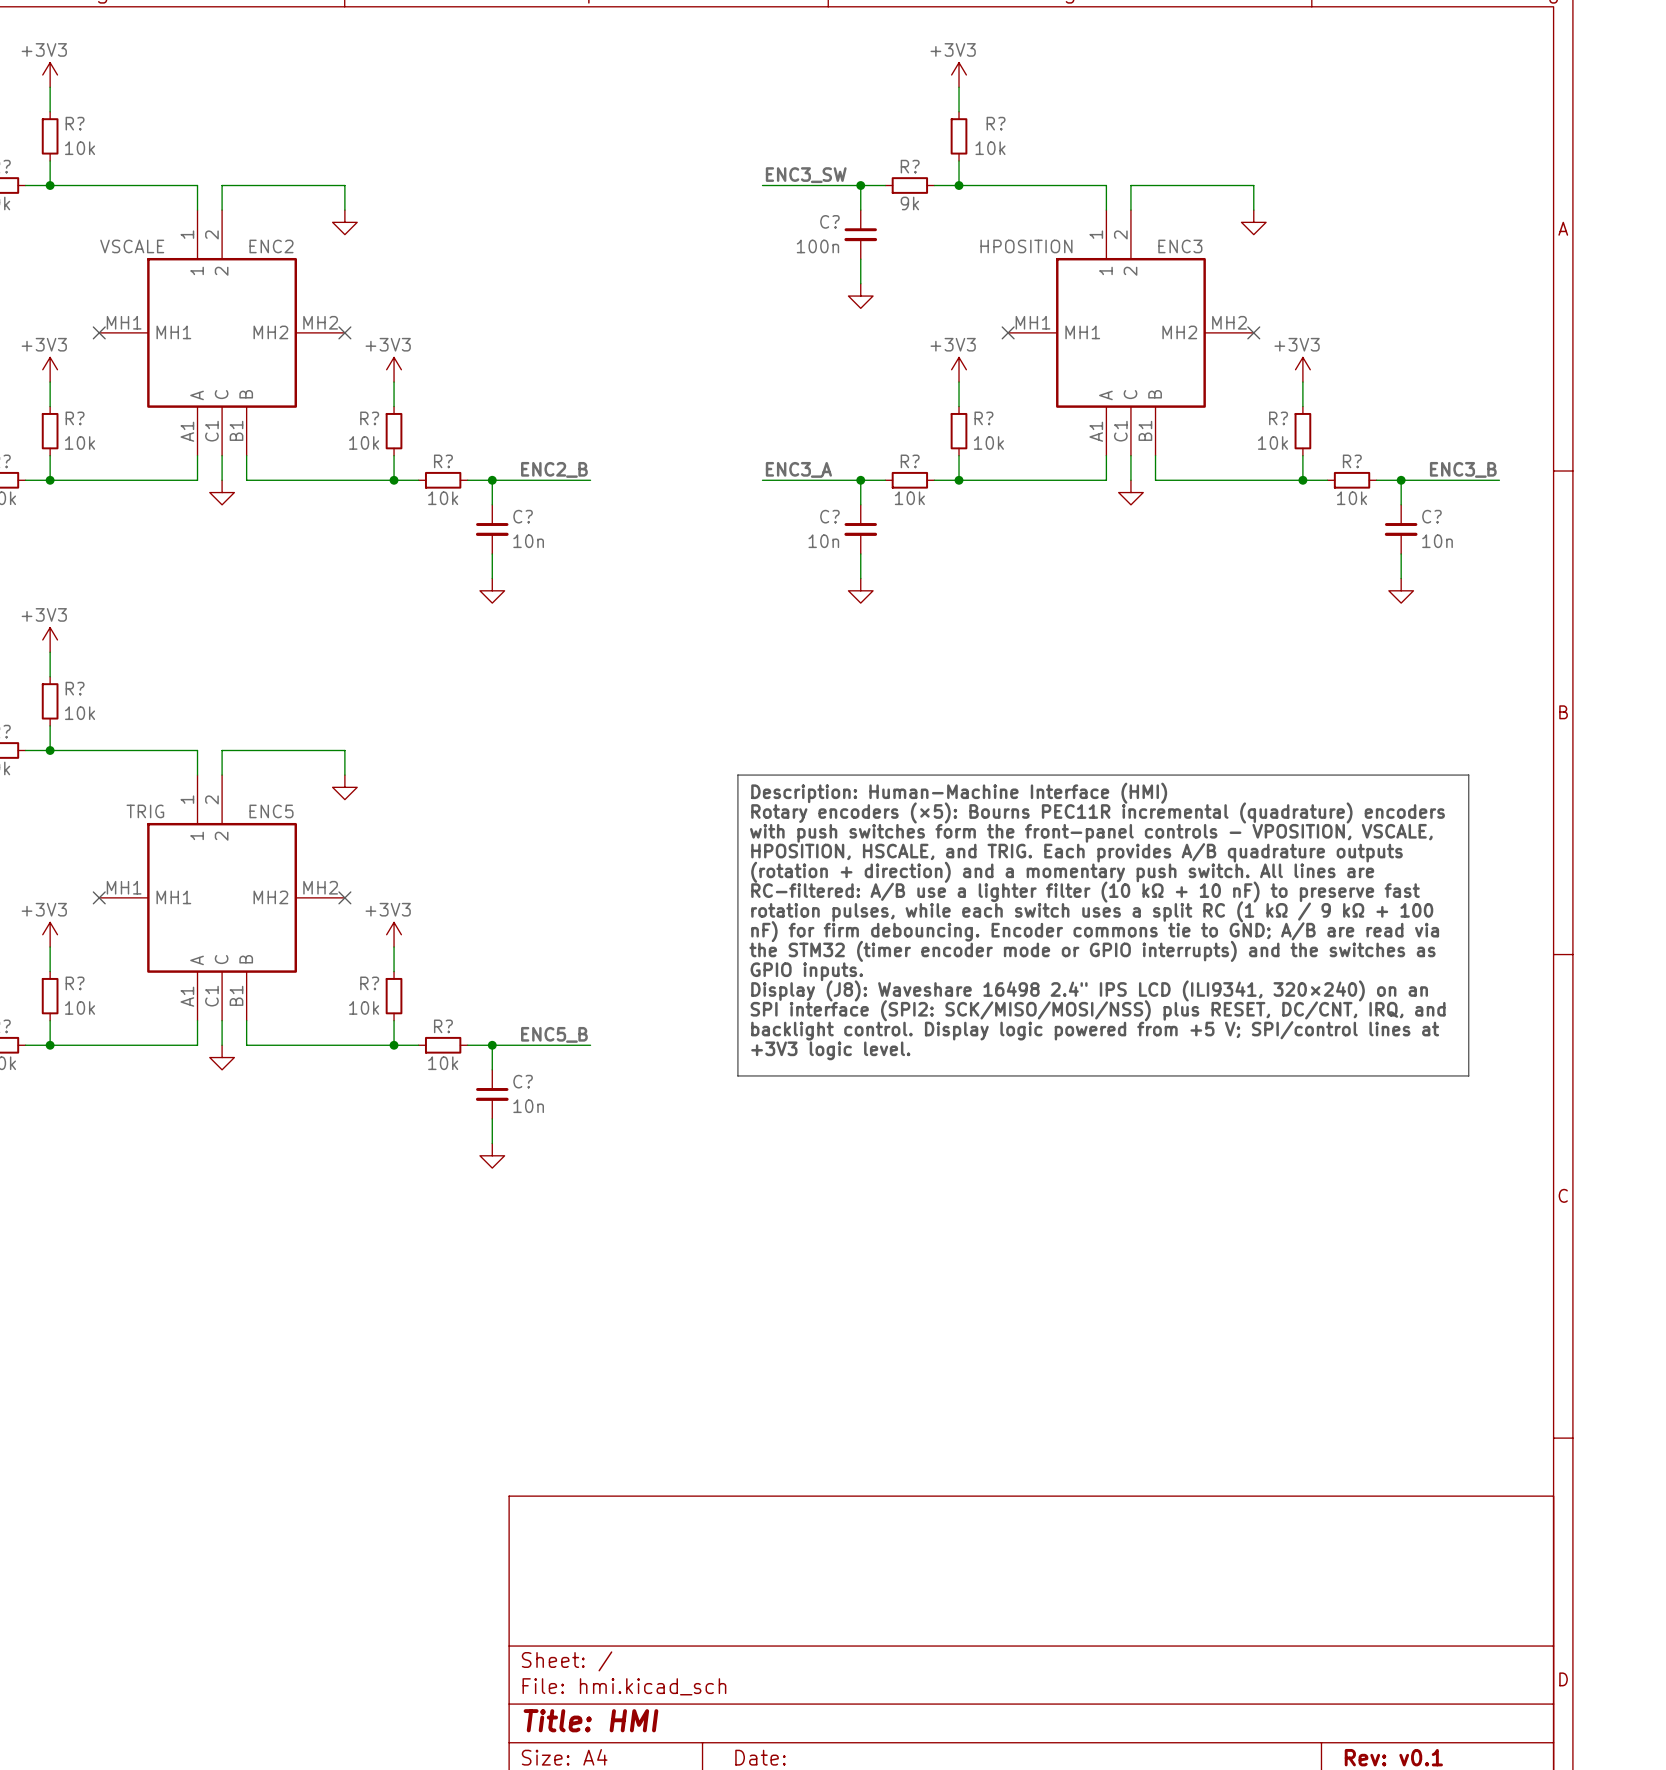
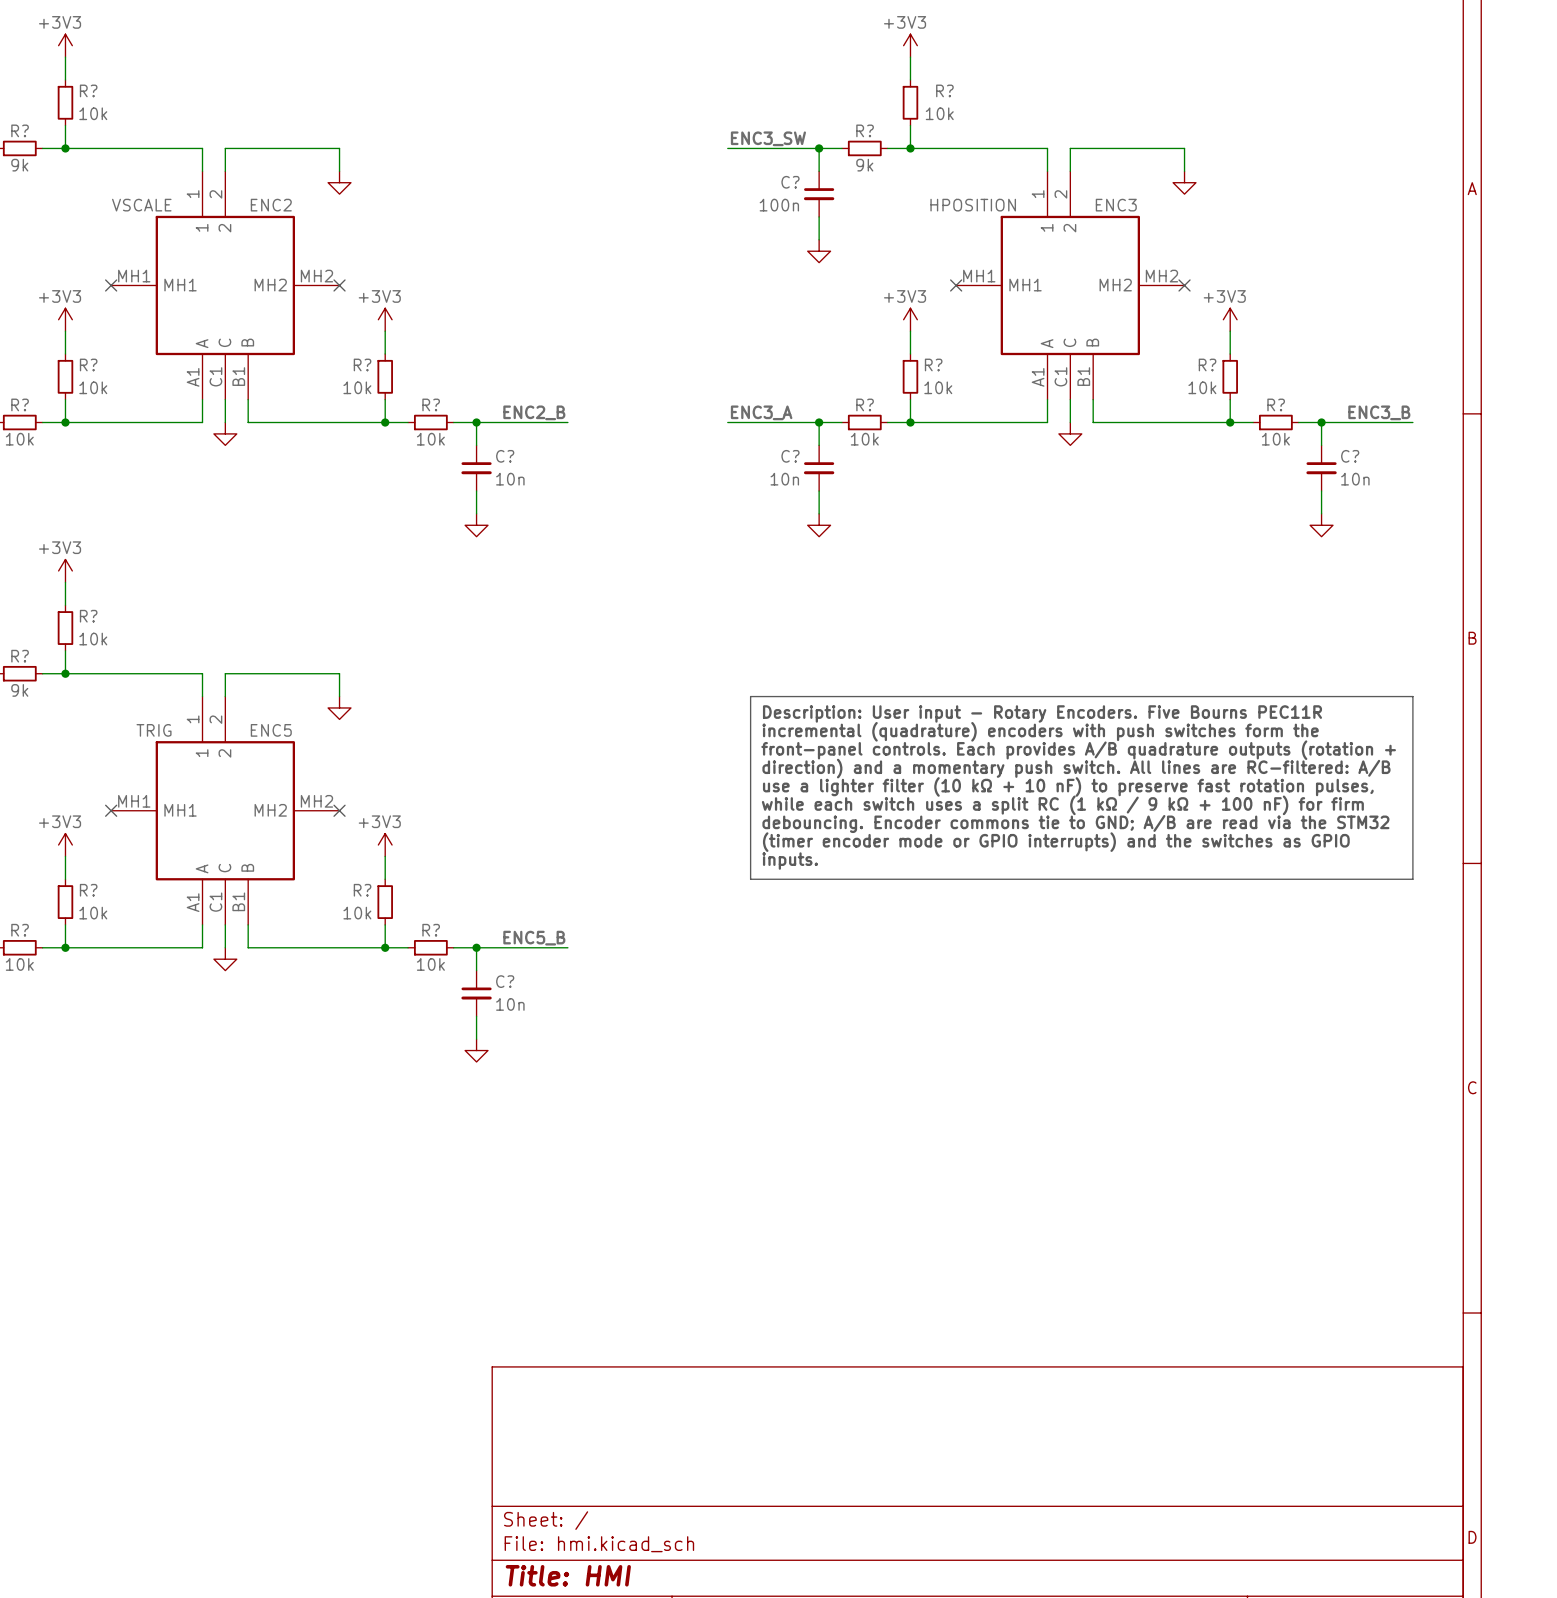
line: (787, 775) (737, 775) (737, 1075) (1468, 1075) (1468, 775) -> (750, 696) (750, 879) (1412, 879) (1412, 696) (1384, 696)
text: Description: Human-Machine Interface (HMI) (959, 793) -> none
text: none -> Description: User input - Rotary Encoders. Five Bourns PEC11R (1042, 713)
text: Rotary encoders (×5): Bourns PEC11R incremental (quadrature) encoders (1098, 812) -> none
text: none -> incremental (quadrature) encoders with push switches form the (1040, 731)
text: with push switches form the front-panel controls - VPOSITION, VSCALE, (1091, 833) -> none
text: HPOSITION, HSCALE, and TRIG. Each provides A/B quadrature outputs (1077, 852) -> front-panel controls. Each provides A/B quadrature outputs (rotation + (1078, 750)
text: (rotation + direction) and a momentary push switch. All lines are (1062, 872) -> direction) and a momentary push switch. All lines are RC-filtered: A/B (1076, 768)
text: RC-filtered: A/B use a lighter filter (10 kΩ + 10 nF) to preserve fast (1085, 892) -> use a lighter filter (10 kΩ + 10 nF) to preserve fast rotation pulses, (1068, 786)
text: rotation pulses, while each switch uses a split RC (1 kΩ / 9 kΩ + 100 (1092, 911) -> while each switch uses a split RC (1 kΩ / 9 kΩ + 100 nF) for firm (1062, 805)
text: nF) for firm debouncing. Encoder commons tie to GND; A/B are read via (1095, 931) -> debouncing. Encoder commons tie to GND; A/B are read via the STM32 (1075, 824)
text: the STM32 (timer encoder mode or GPIO interrupts) and the switches as (1092, 951) -> (timer encoder mode or GPIO interrupts) and the switches as GPIO (1056, 842)
text: GPIO inputs. (806, 971) -> inputs. (790, 861)
text: Display (J8): Waveshare 16498 2.4" IPS LCD (ILI9341, 320×240) on an (1089, 990) -> none
text: SPI interface (SPI2: SCK/MISO/MOSI/NSS) plus RESET, DC/CNT, IRQ, and (1098, 1010) -> none
text: backlight control. Display logic powered from +5 V; SPI/control lines at (1095, 1030) -> none
text: +3V3 logic level. (830, 1050) -> none

